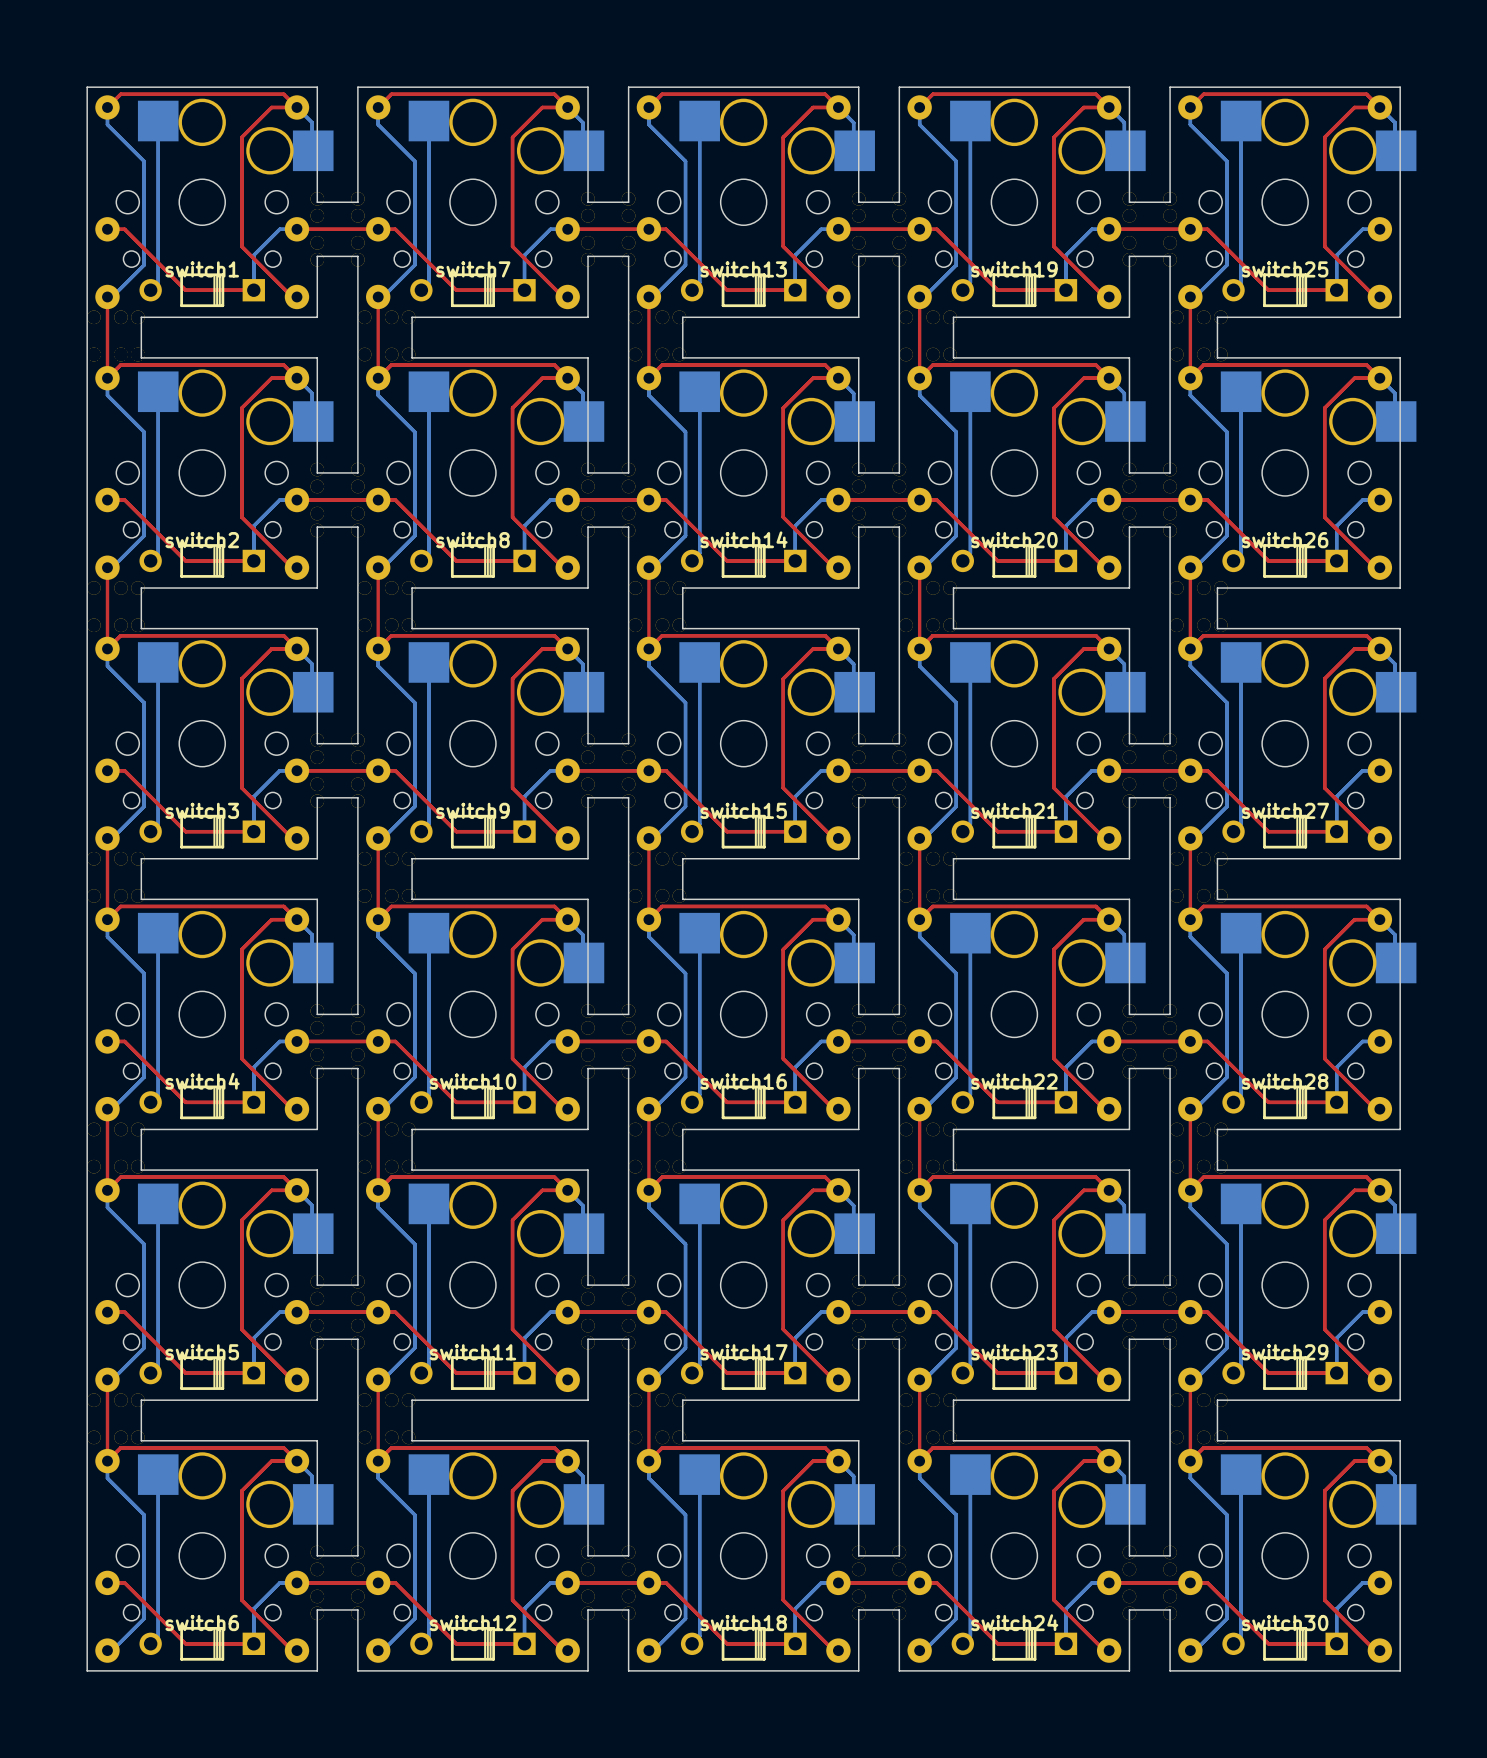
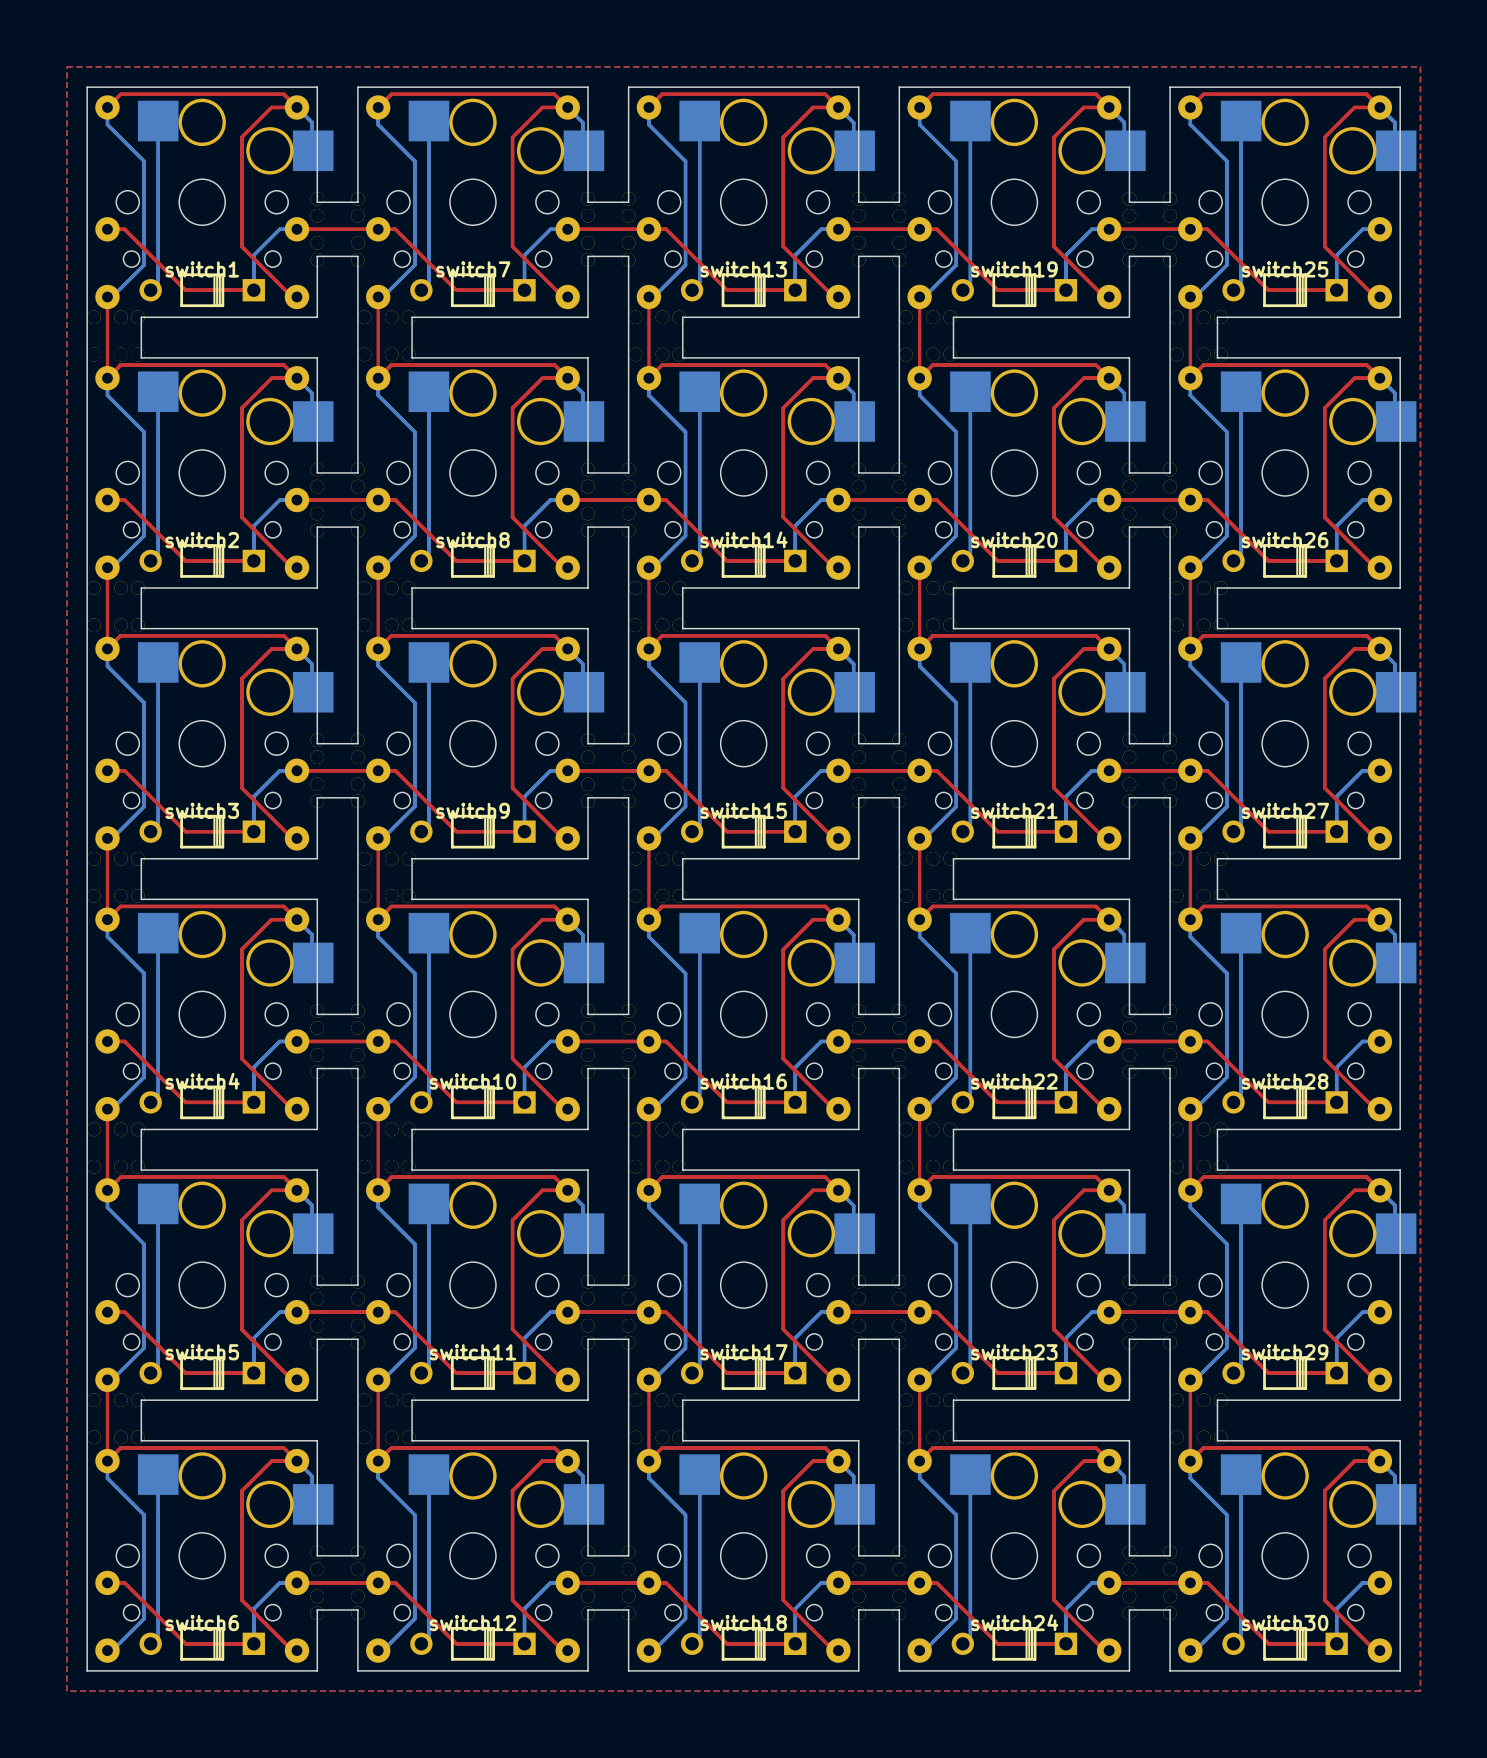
top zone outline: none -> (66, 66) (66, 1691) (1420, 1691) (1420, 66) (66, 66)

